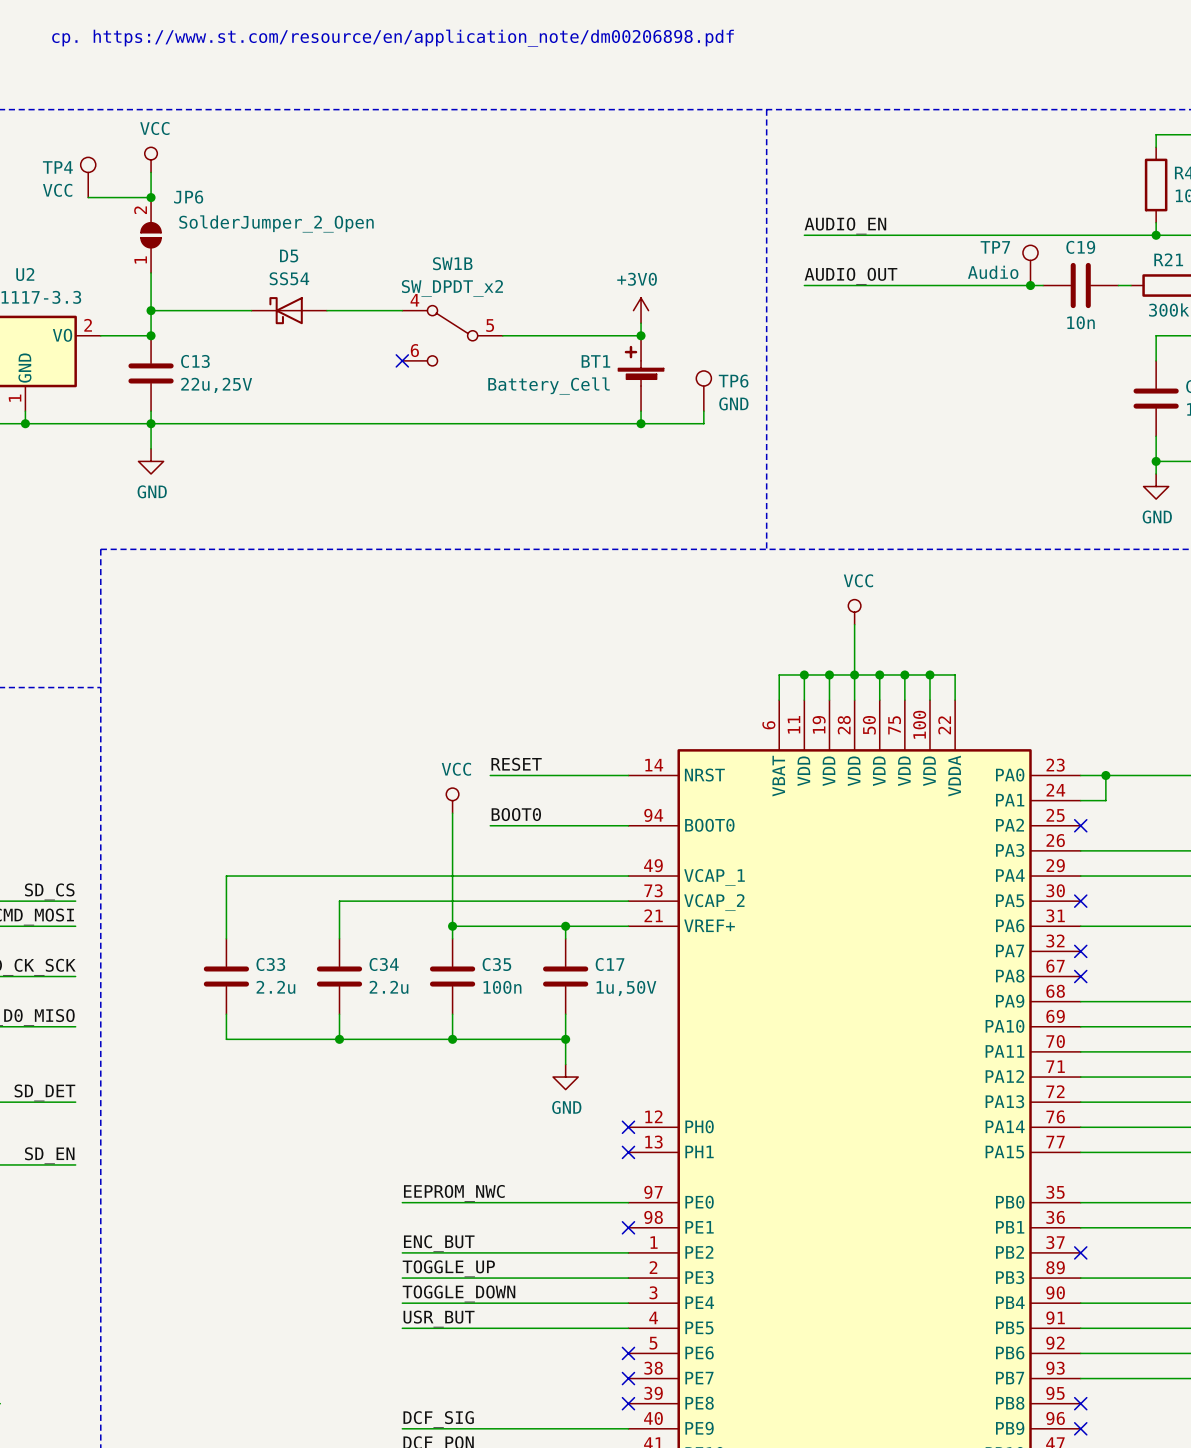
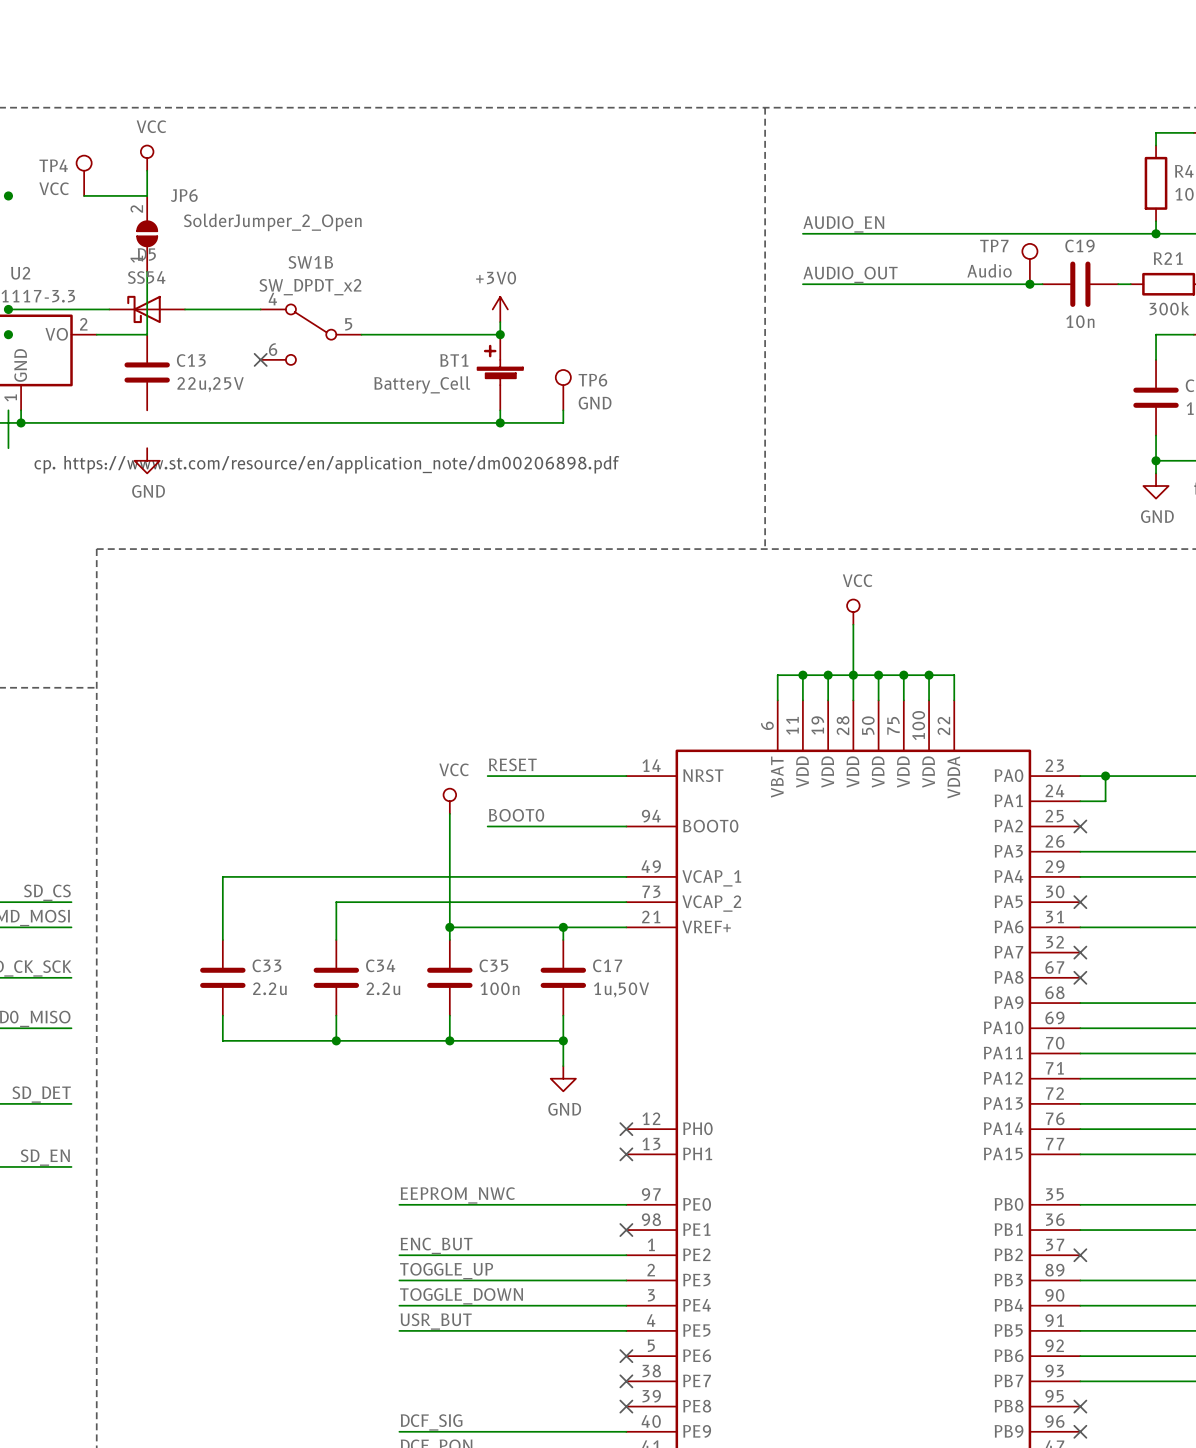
text: cp. https://www.st.com/resource/en/application_note/dm00206898.pdf (393, 38) -> none
junction: none -> (8, 195)
junction: (151, 197) -> none
wire: none -> (8, 309) (109, 309)
junction: none -> (8, 309)
junction: (151, 310) -> none
D5 position: (289, 310) -> (147, 309)
wire: (326, 310) (402, 310) -> none
power symbol position: +3V0 (641, 310) -> +3V0 (500, 309)
wire: (641, 323) (641, 335) (502, 335) -> (500, 322) (500, 334) (361, 334)
junction: none -> (8, 334)
junction: (151, 335) -> none
SW1B position: (452, 335) -> (311, 334)
junction: none -> (500, 334)
junction: (641, 335) -> none
no-connect mark: none -> (260, 359)
no-connect mark: (402, 360) -> none
BT1 position: (641, 373) -> (500, 372)
TP6 position: (703, 391) -> (563, 390)
wire: (151, 411) (151, 448) -> (8, 410) (8, 448)
wire: (641, 411) (641, 423) -> (500, 410) (500, 422)
wire: (703, 411) (703, 423) (565, 423) -> (563, 410) (563, 422)
junction: (151, 423) -> none
junction: none -> (500, 422)
junction: (641, 423) -> none
text: none -> cp. https://www.st.com/resource/en/application_note/dm00206898.pdf (326, 464)

